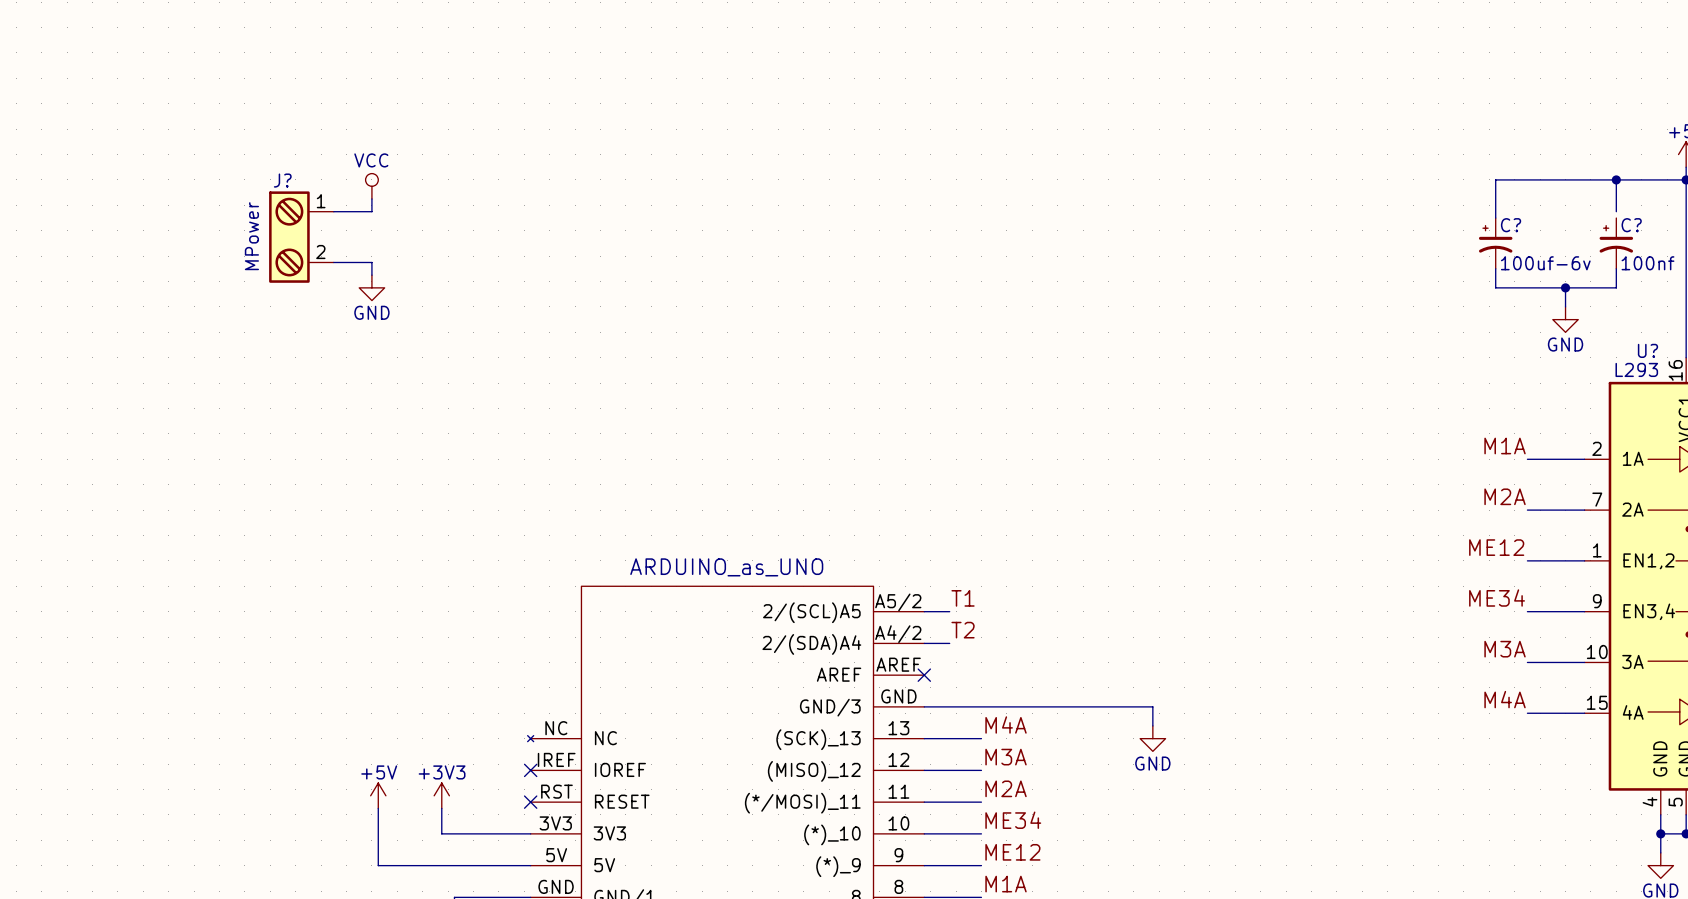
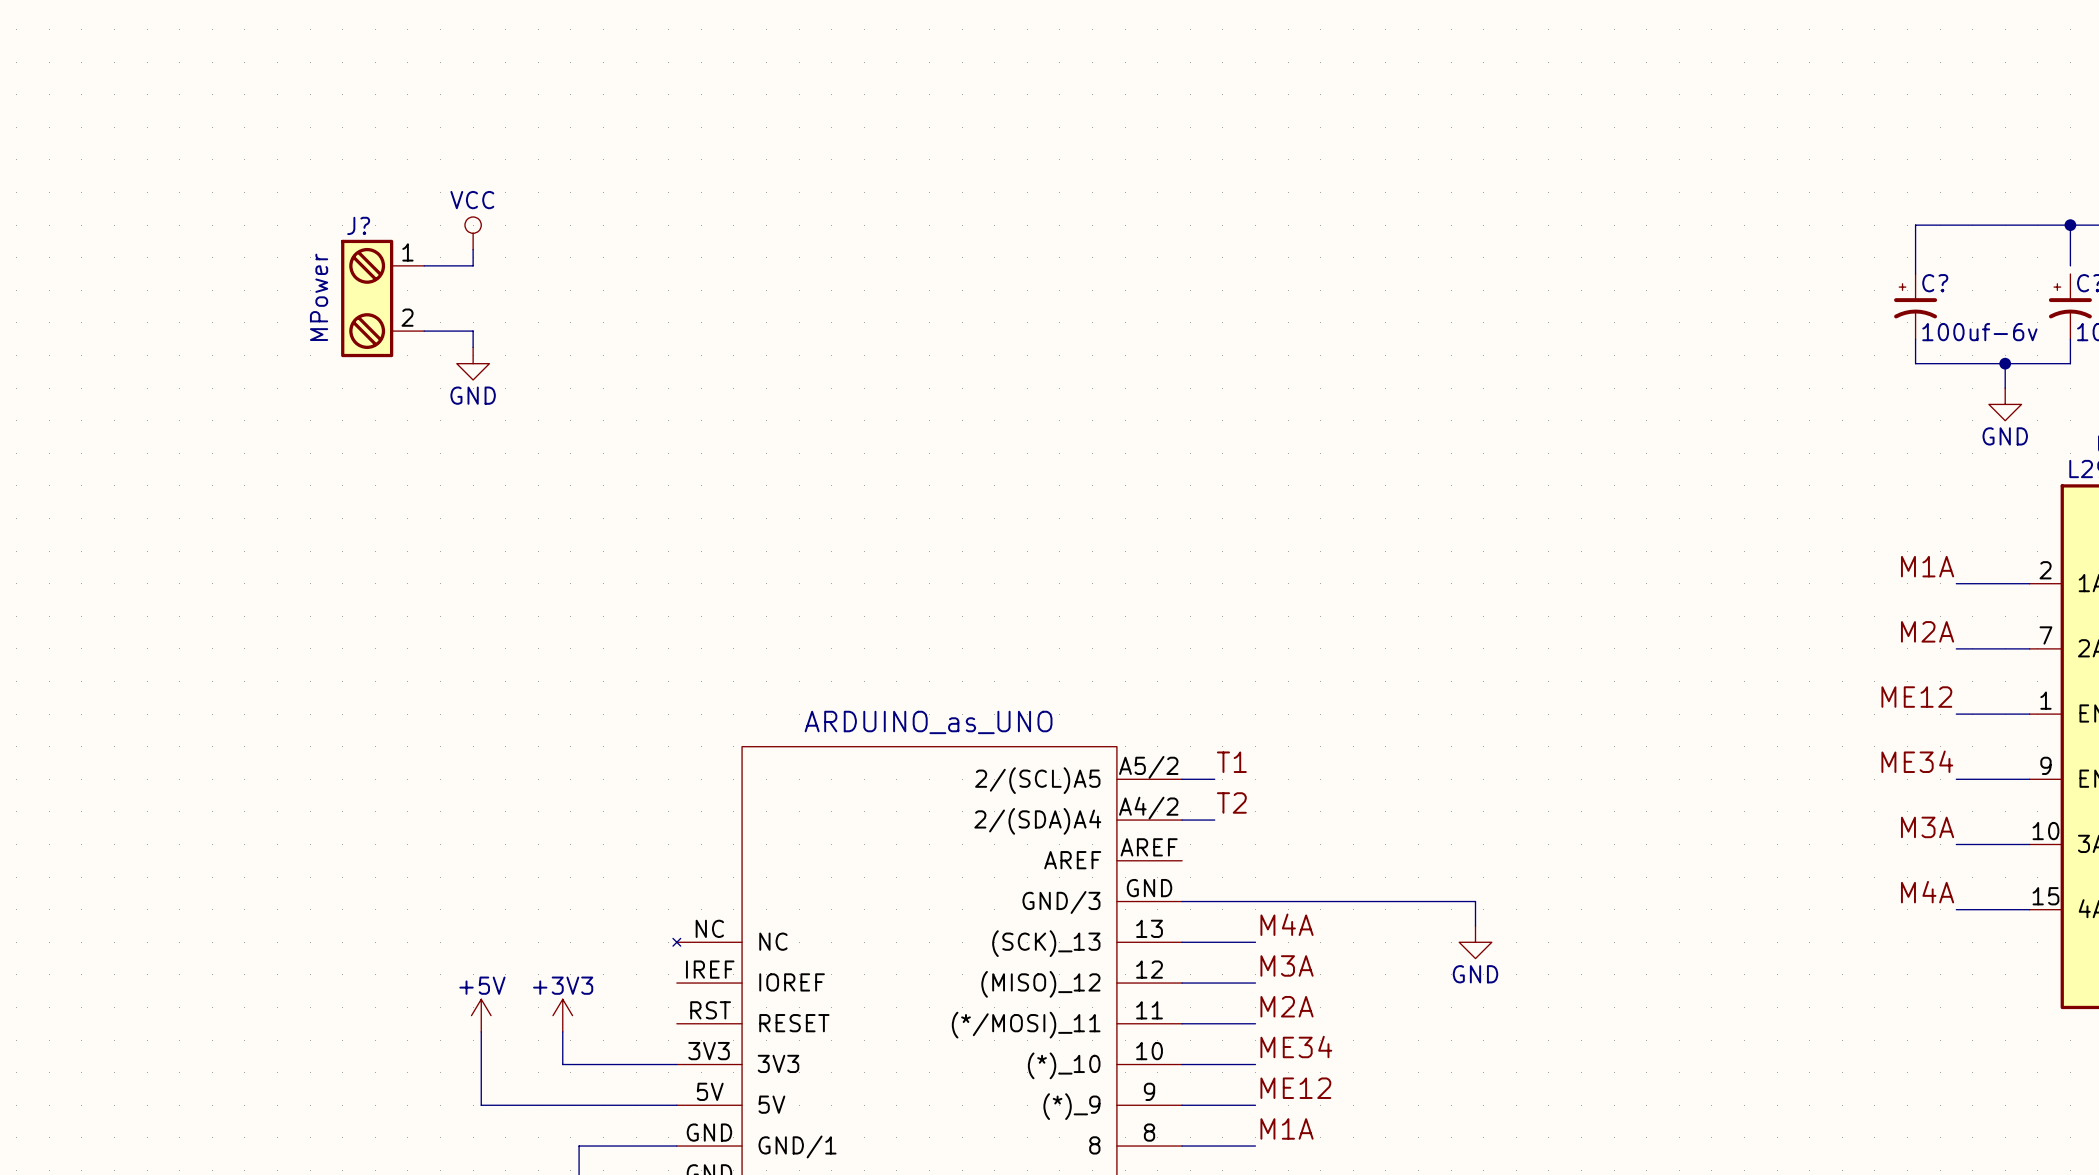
no-connect mark: (924, 675) -> none
no-connect mark: (530, 770) -> none
no-connect mark: (530, 802) -> none

